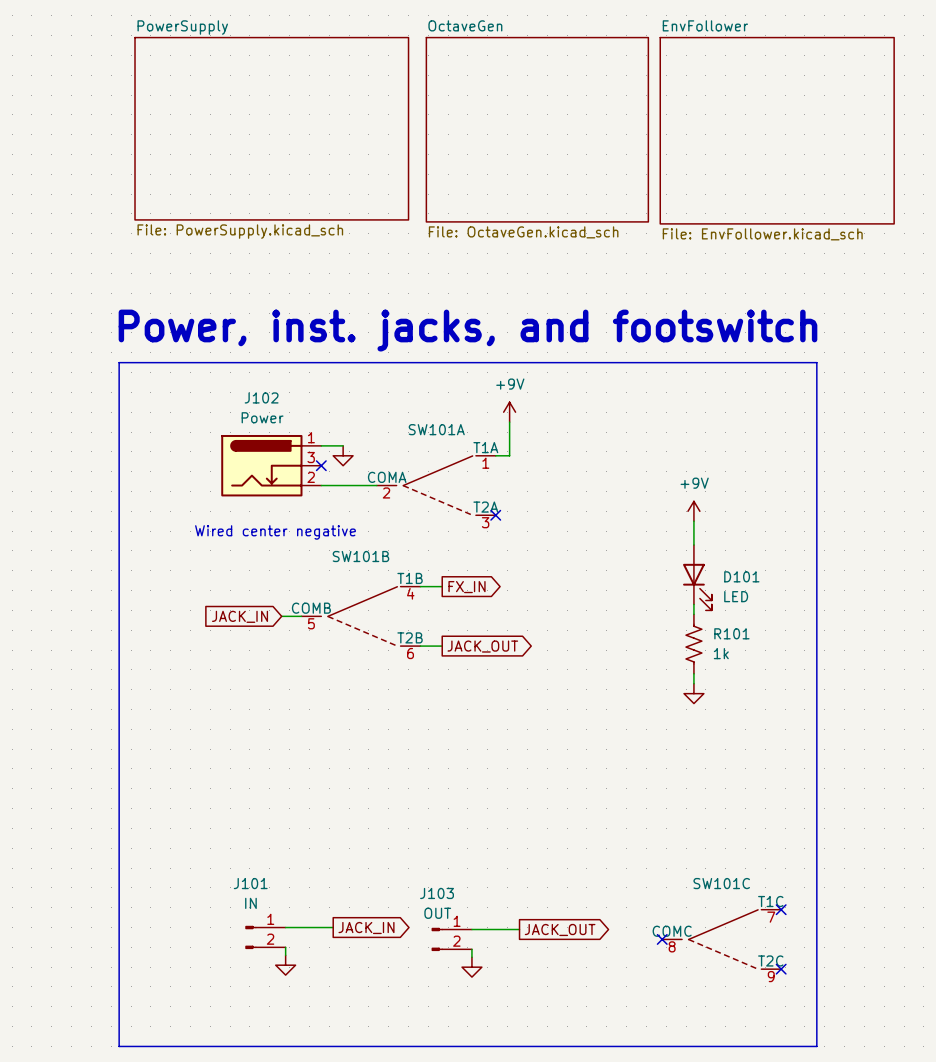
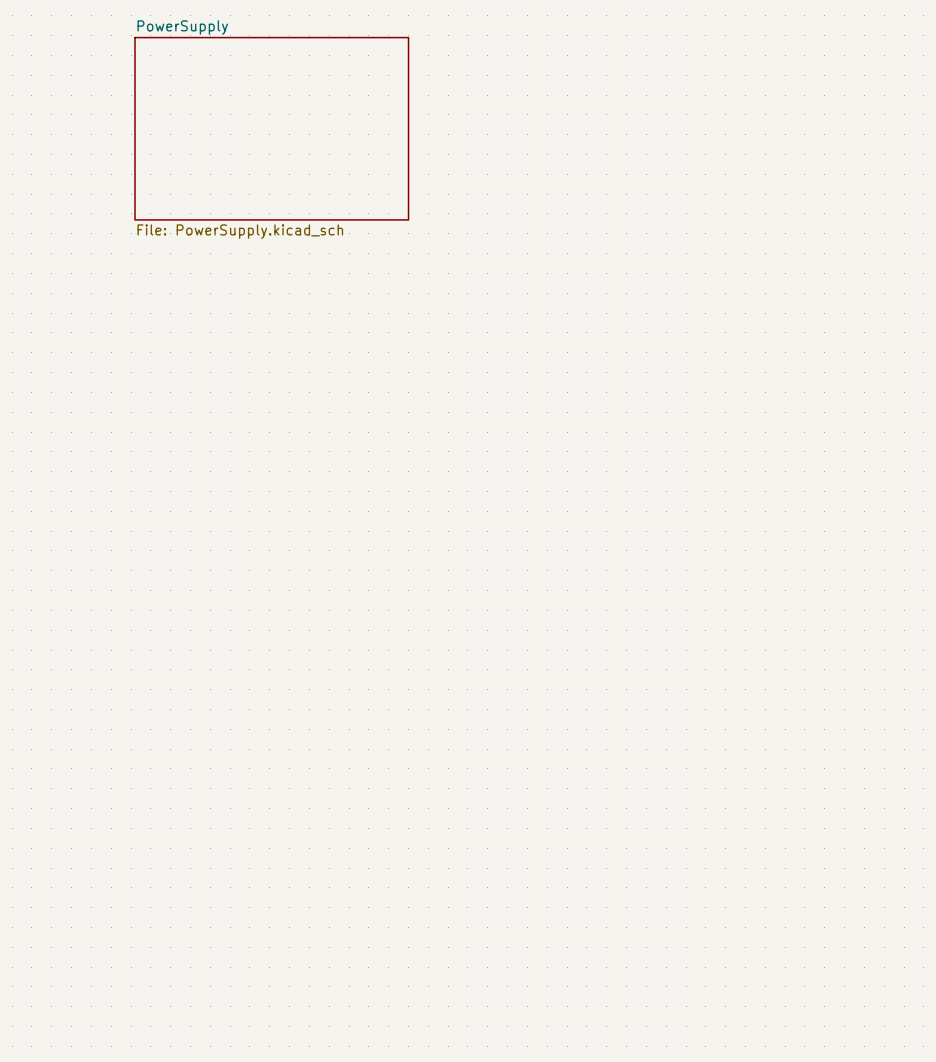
sheet OctaveGen: File: OctaveGen.kicad_sch (537, 129) -> none
sheet EnvFollower: File: EnvFollower.kicad_sch (777, 130) -> none
text: Power, inst. jacks, and footswitch (467, 330) -> none
line: (119, 362) (816, 362) (816, 1046) (119, 1046) (119, 362) -> none
power symbol: +9V (509, 412) -> none
wire: (509, 422) (509, 455) (495, 455) -> none
wire: (321, 445) (343, 445) -> none
power symbol: (343, 455) -> none
J102: Power (271, 465) -> none
no-connect mark: (321, 465) -> none
wire: (321, 485) (376, 485) -> none
SW101A: (436, 485) -> none
power symbol: +9V (693, 511) -> none
no-connect mark: (495, 515) -> none
wire: (693, 521) (693, 544) -> none
text: Wired center negative (275, 532) -> none
D101: LED (697, 577) -> none
wire: (420, 586) (442, 586) -> none
global label: FX_IN (467, 587) -> none
wire: (693, 604) (693, 614) -> none
global label: JACK_IN (240, 616) -> none
wire: (281, 616) (301, 616) -> none
SW101B: (360, 616) -> none
R101: 1k (693, 644) -> none
wire: (420, 646) (442, 646) -> none
global label: JACK_OUT (482, 646) -> none
wire: (693, 673) (693, 683) -> none
power symbol: (693, 693) -> none
no-connect mark: (781, 909) -> none
wire: (285, 927) (333, 927) -> none
global label: JACK_IN (366, 928) -> none
wire: (471, 929) (519, 929) -> none
global label: JACK_OUT (560, 929) -> none
J101: IN (265, 937) -> none
J103: OUT (451, 939) -> none
no-connect mark: (662, 939) -> none
SW101C: (721, 939) -> none
wire: (285, 947) (285, 955) -> none
wire: (471, 949) (471, 957) -> none
power symbol: (285, 965) -> none
power symbol: (471, 967) -> none
no-connect mark: (781, 969) -> none

